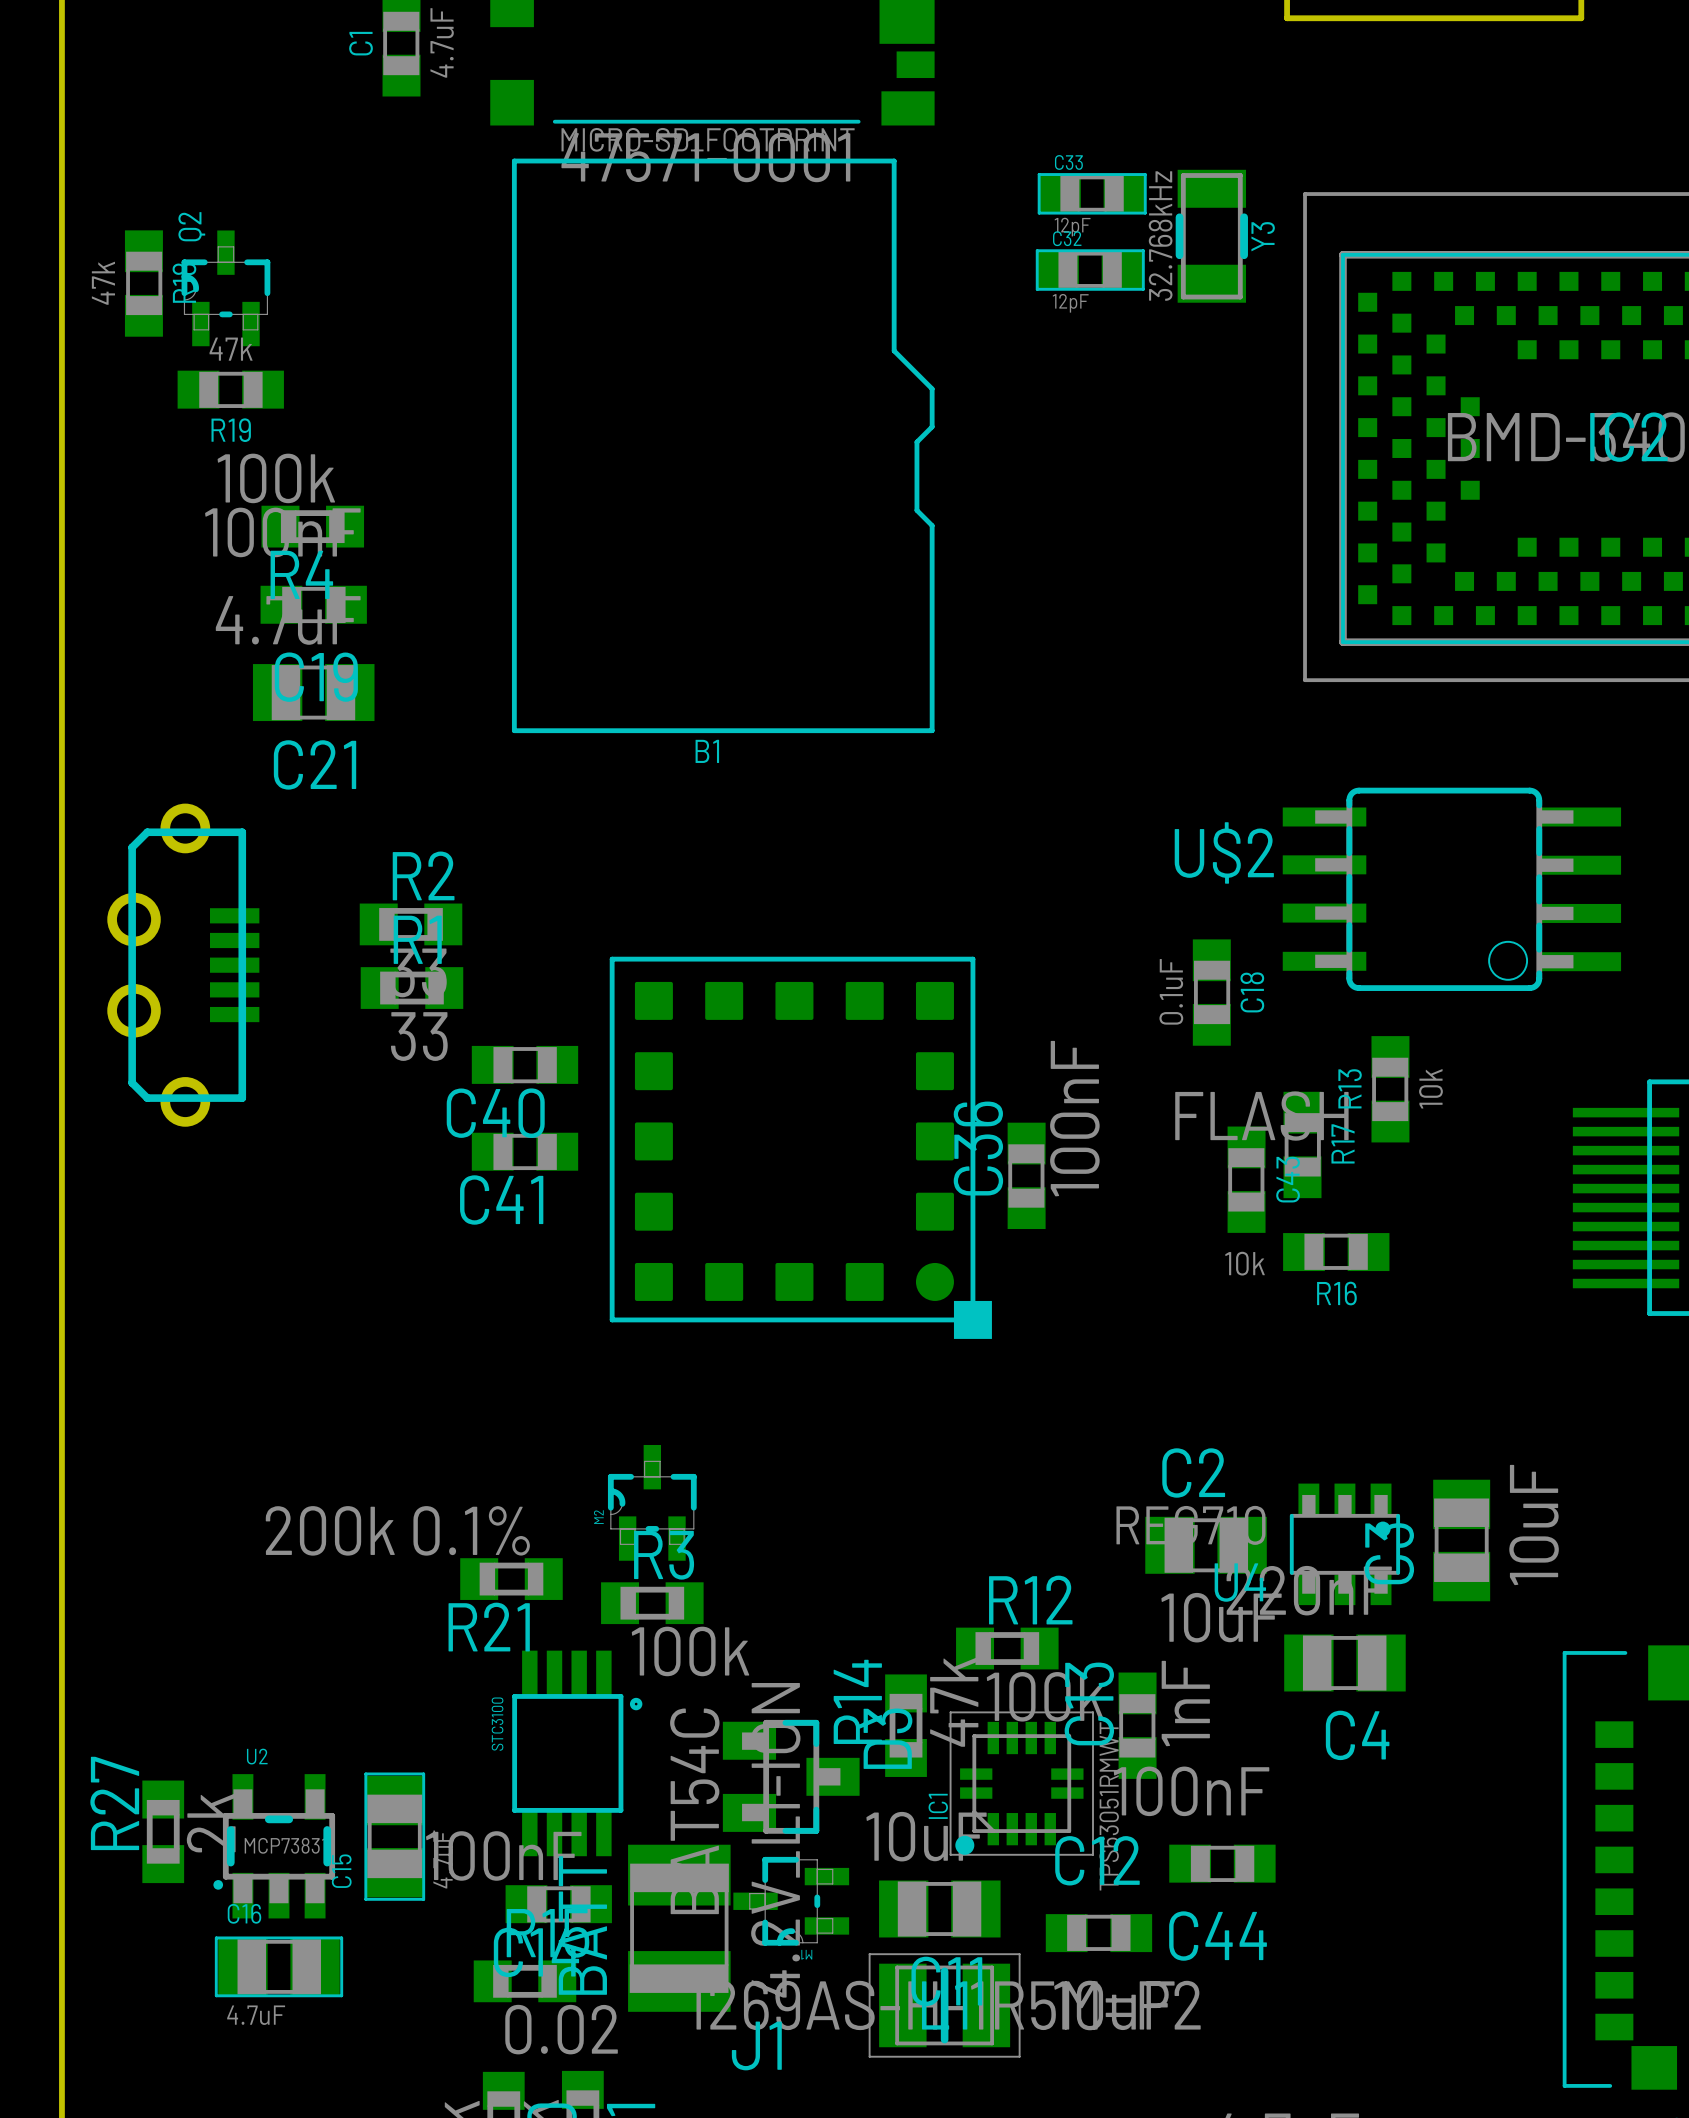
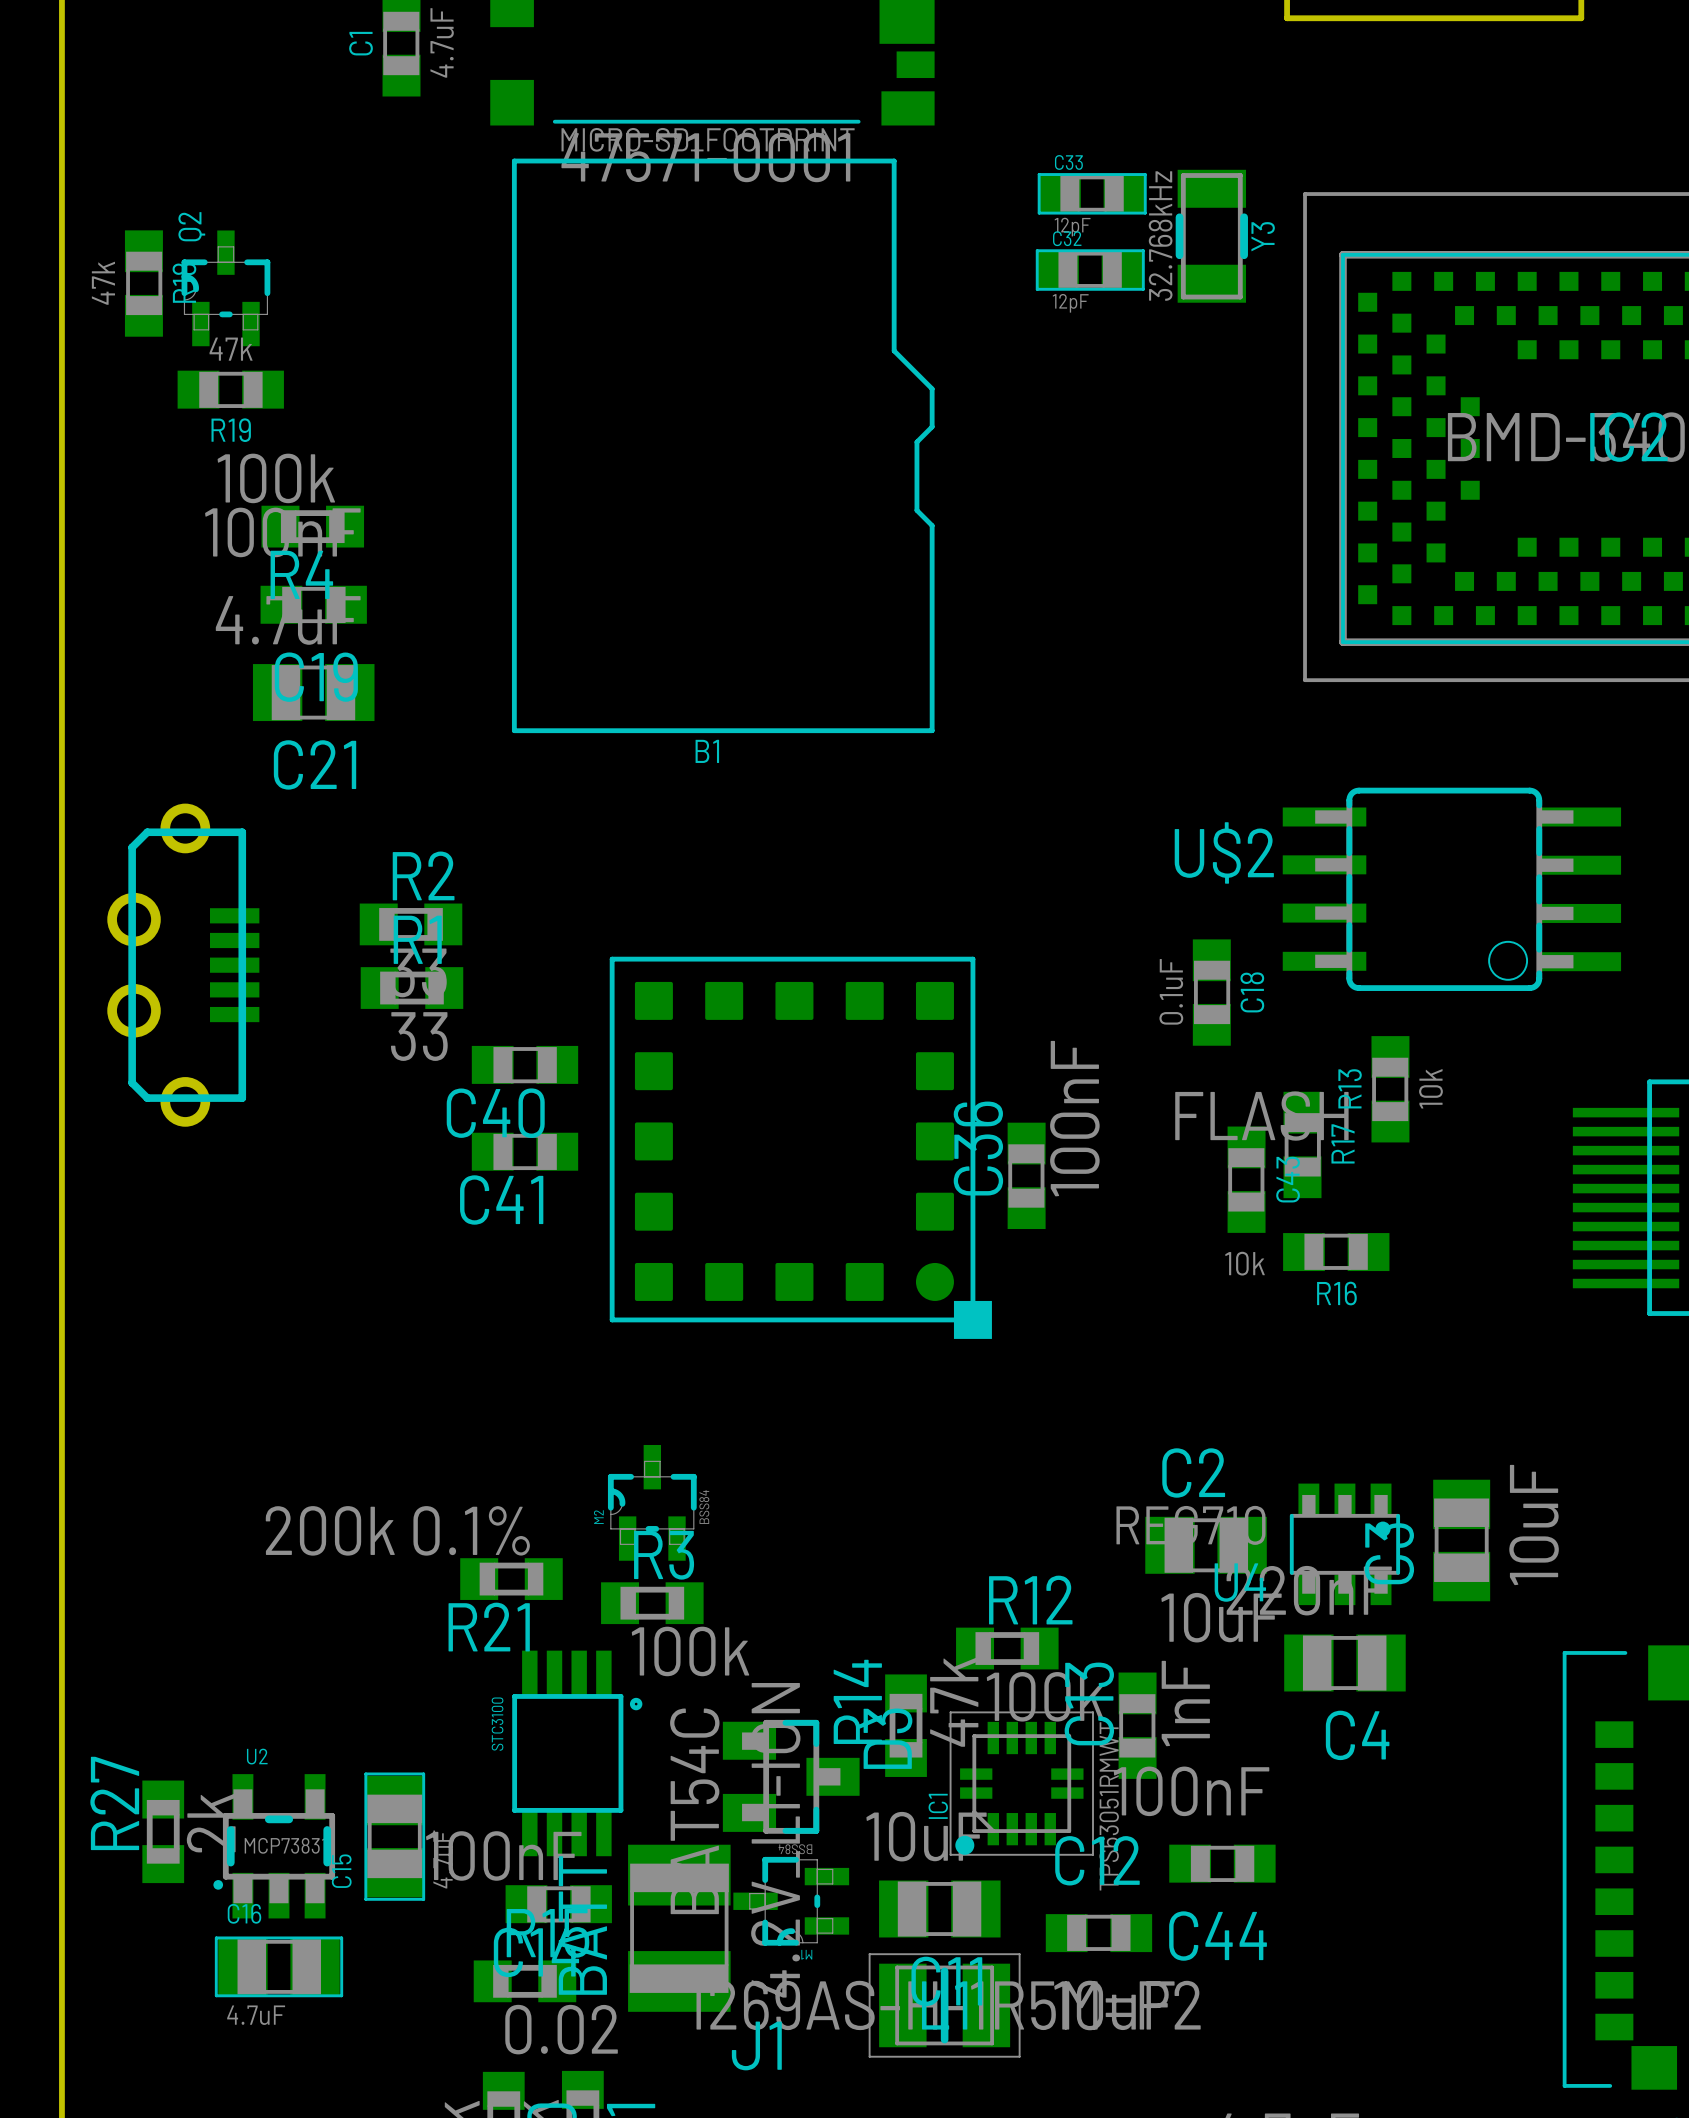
M2 value: none -> BSS84 (704, 1507)
M1 value: none -> BSS84 (795, 1849)

